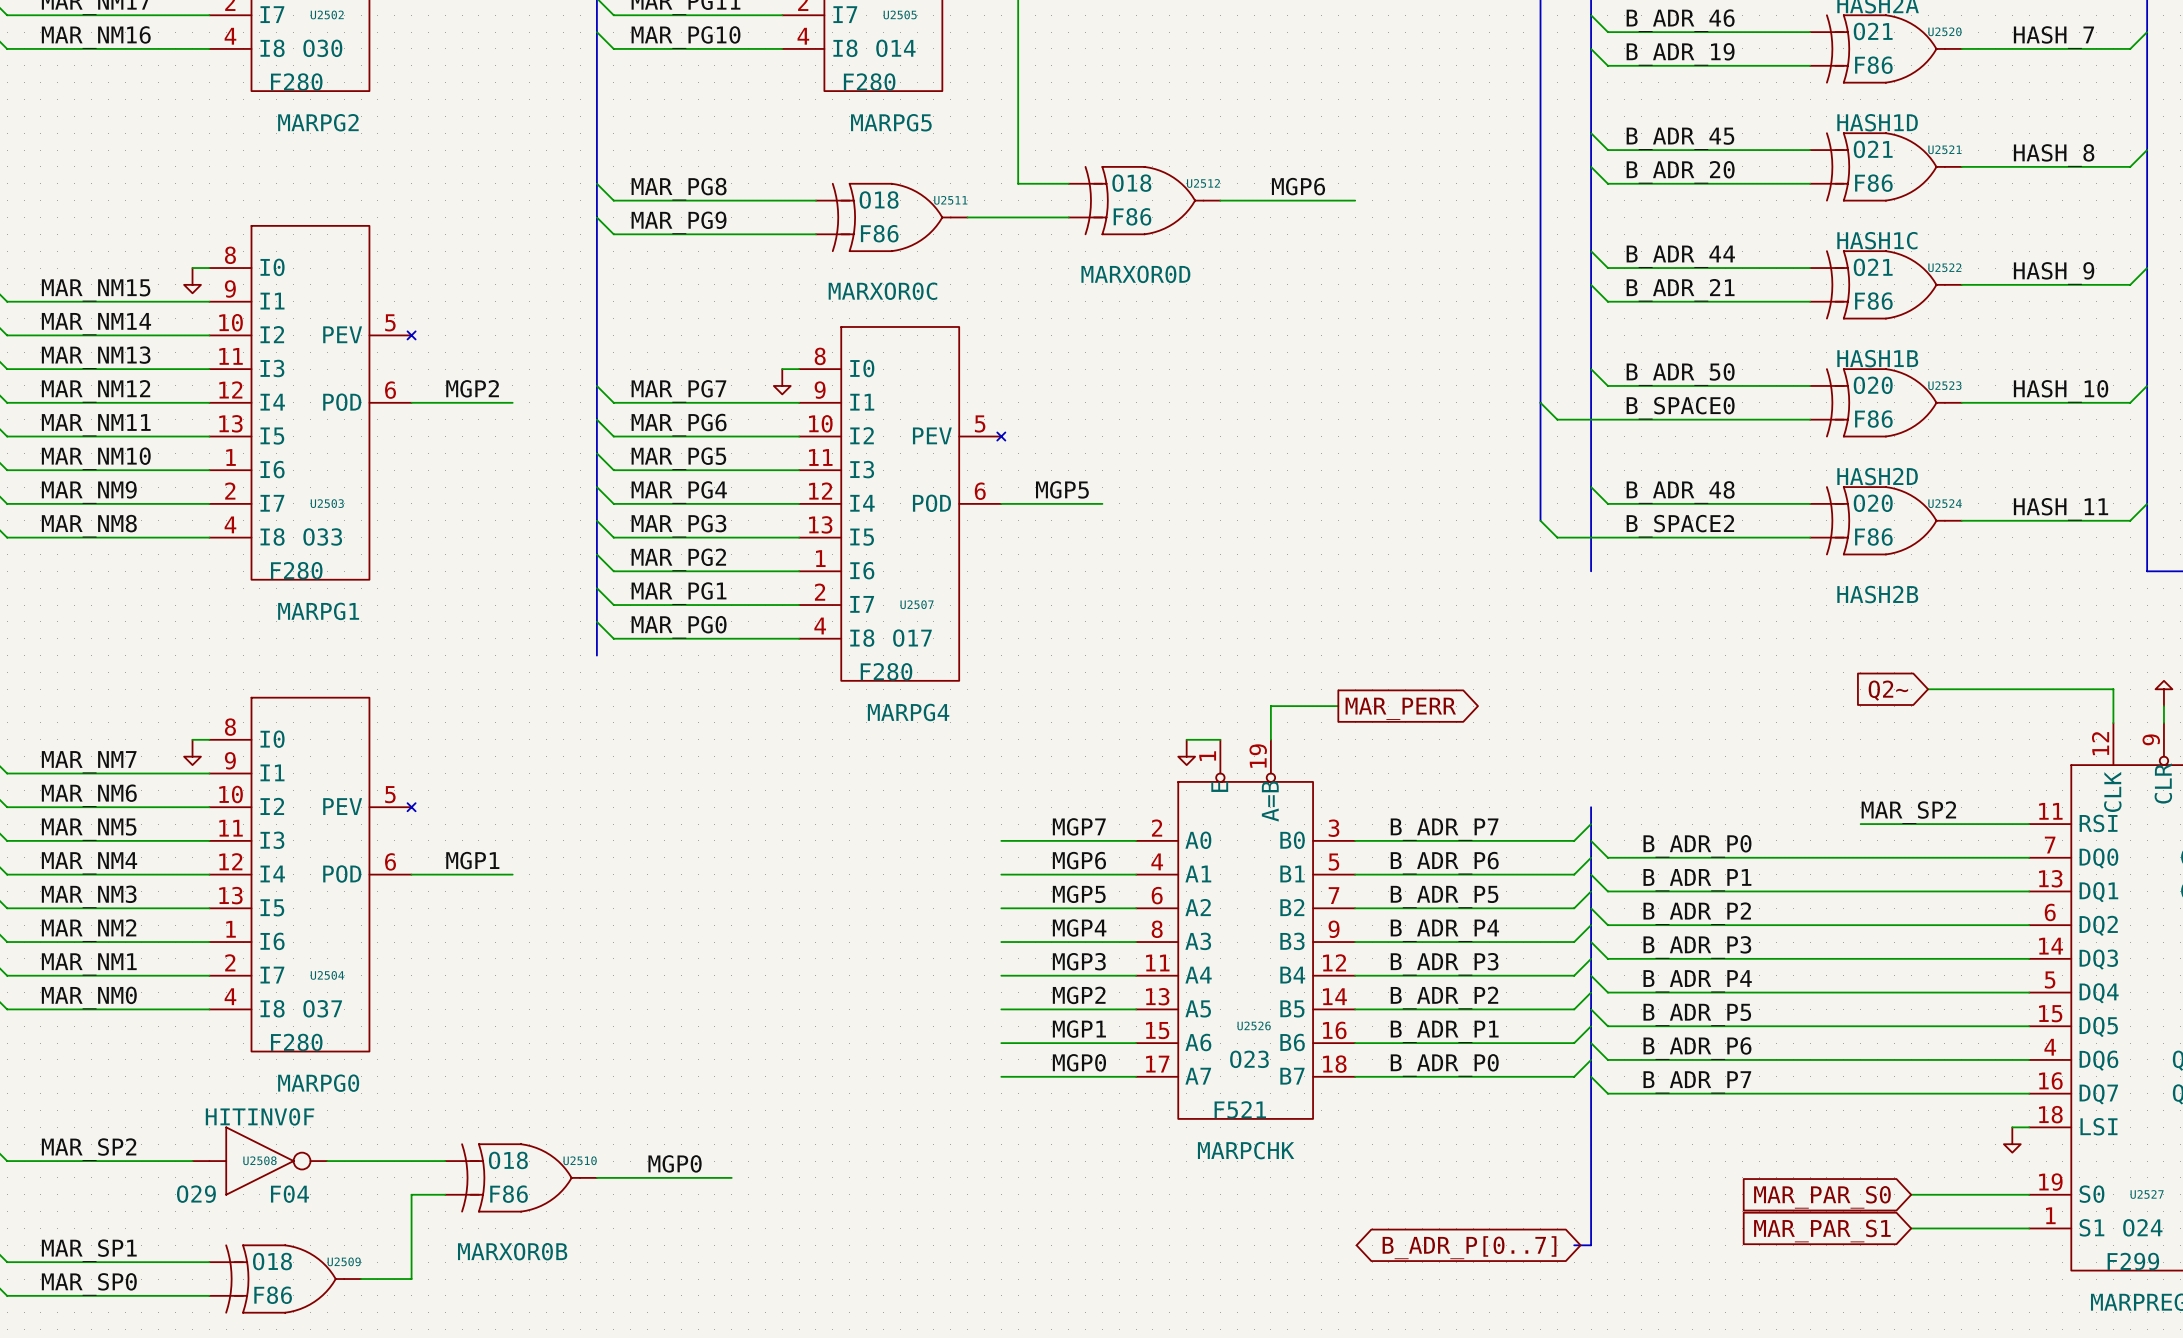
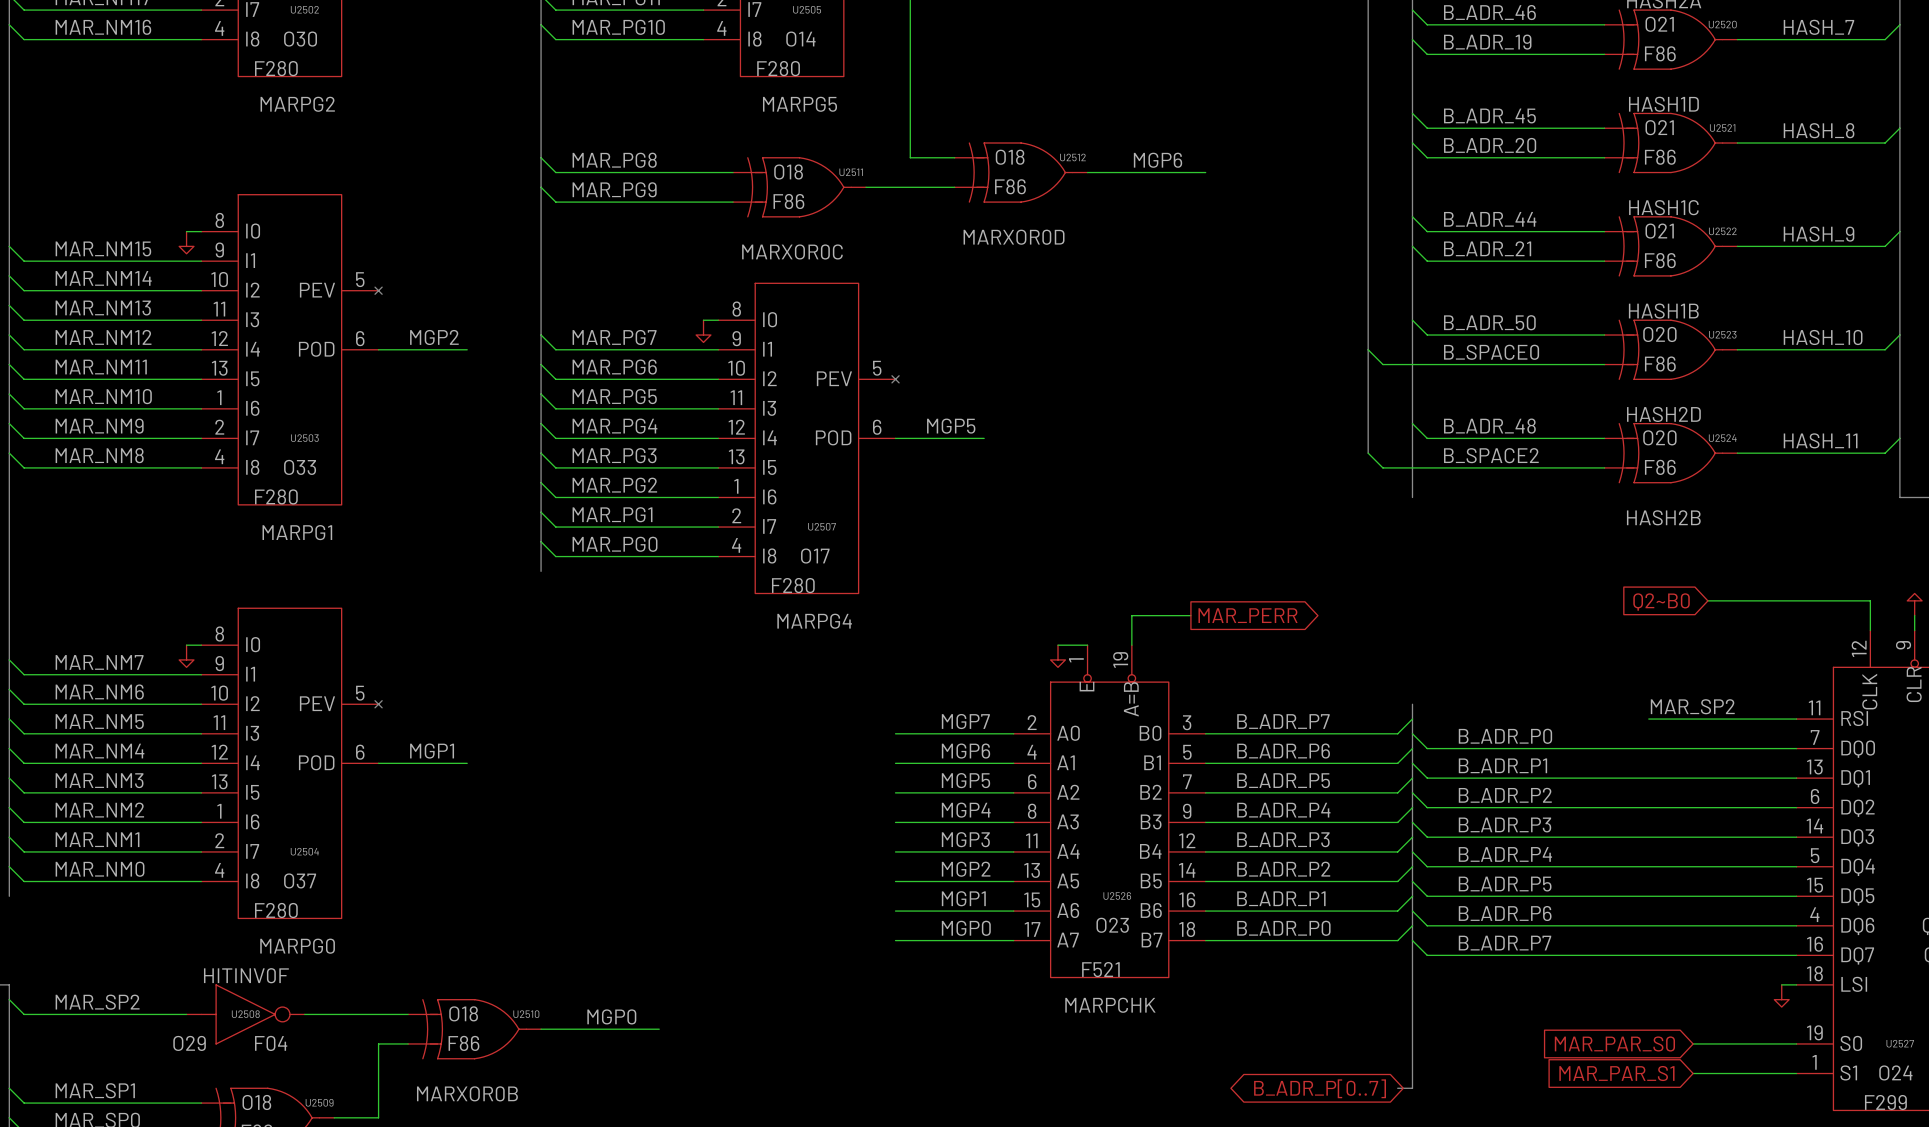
global label: Q2~ (1888, 690) -> Q2~B0 (1661, 601)

